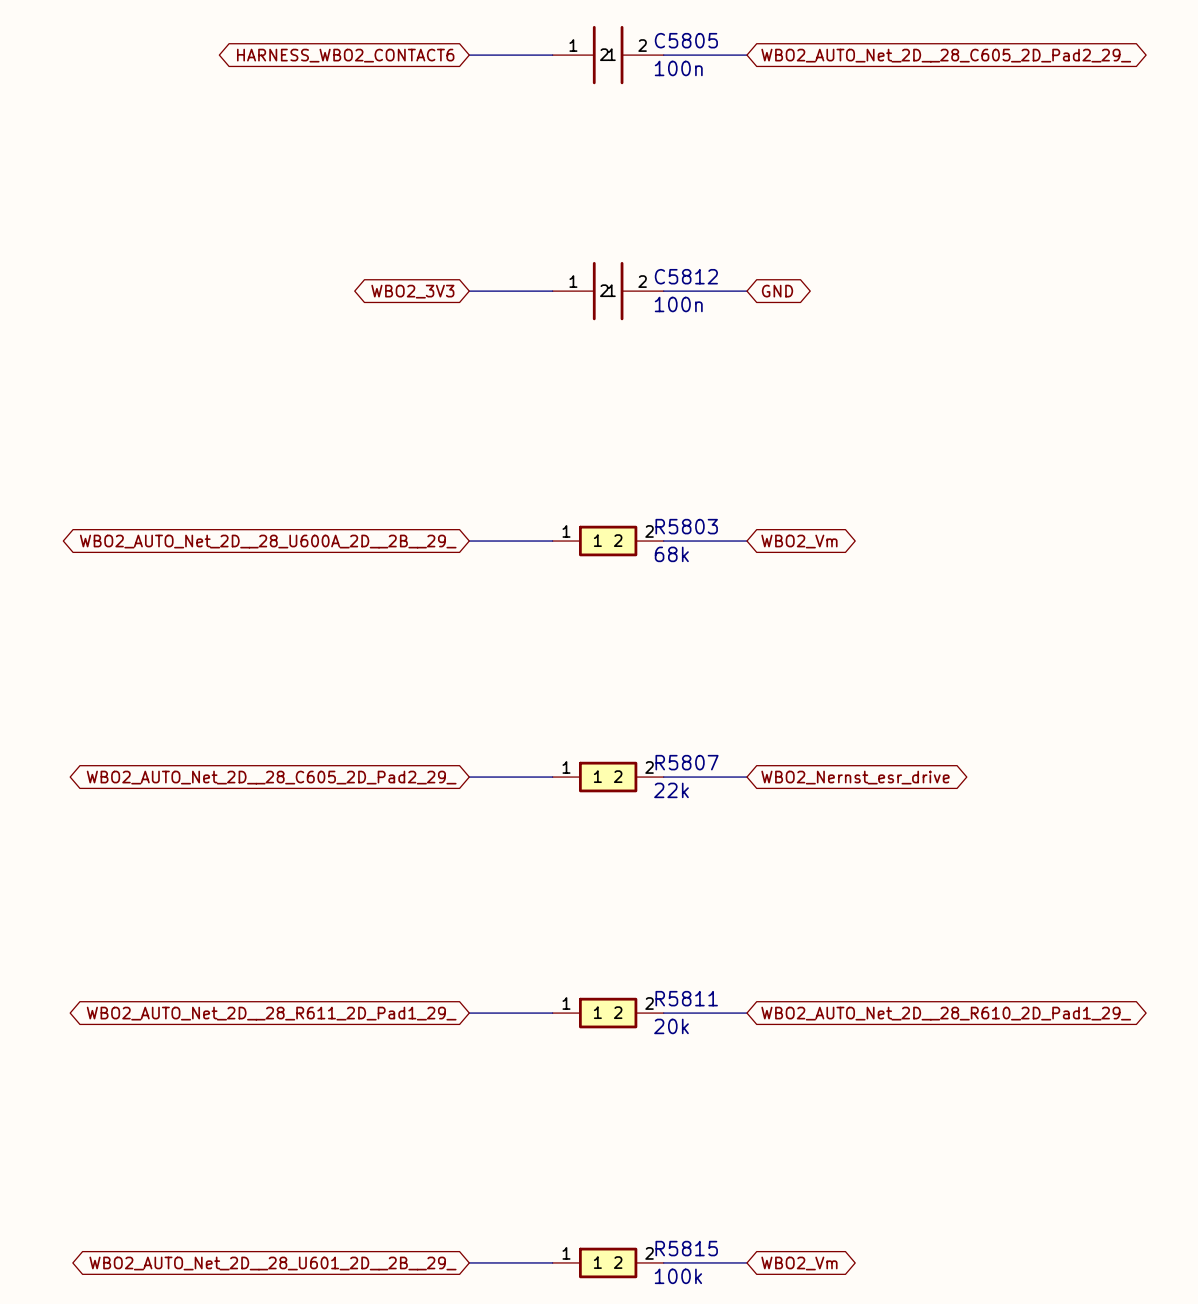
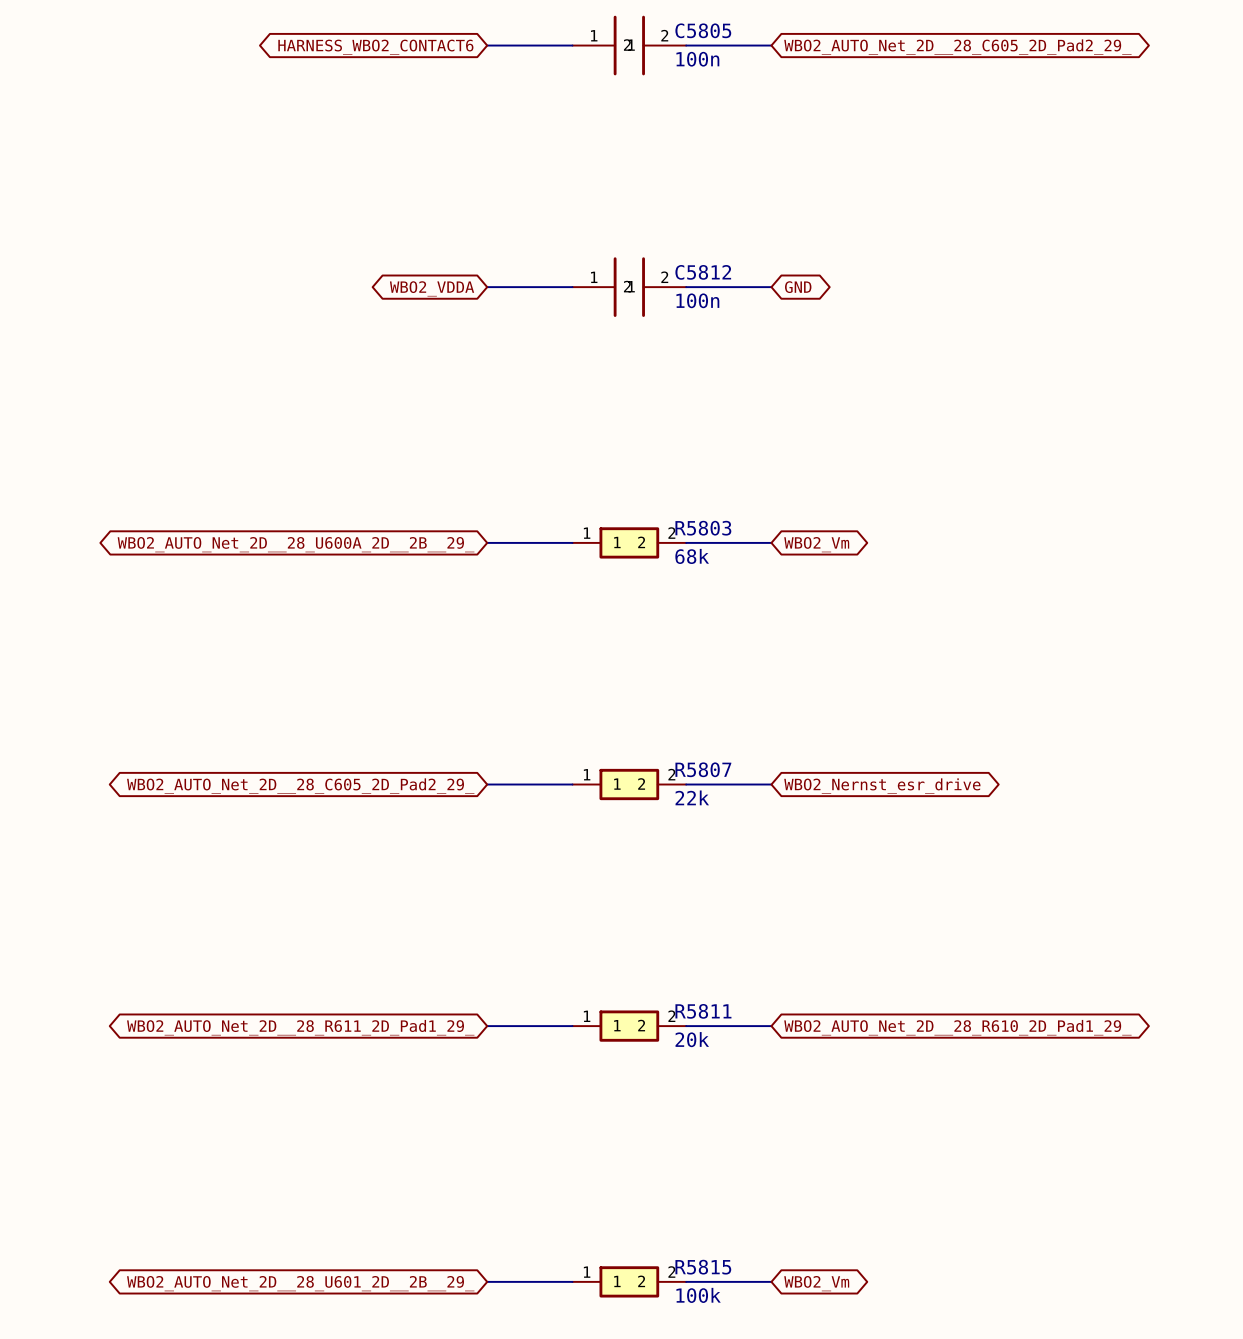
global label: WBO2_3V3 (412, 291) -> WBO2_VDDA (432, 288)

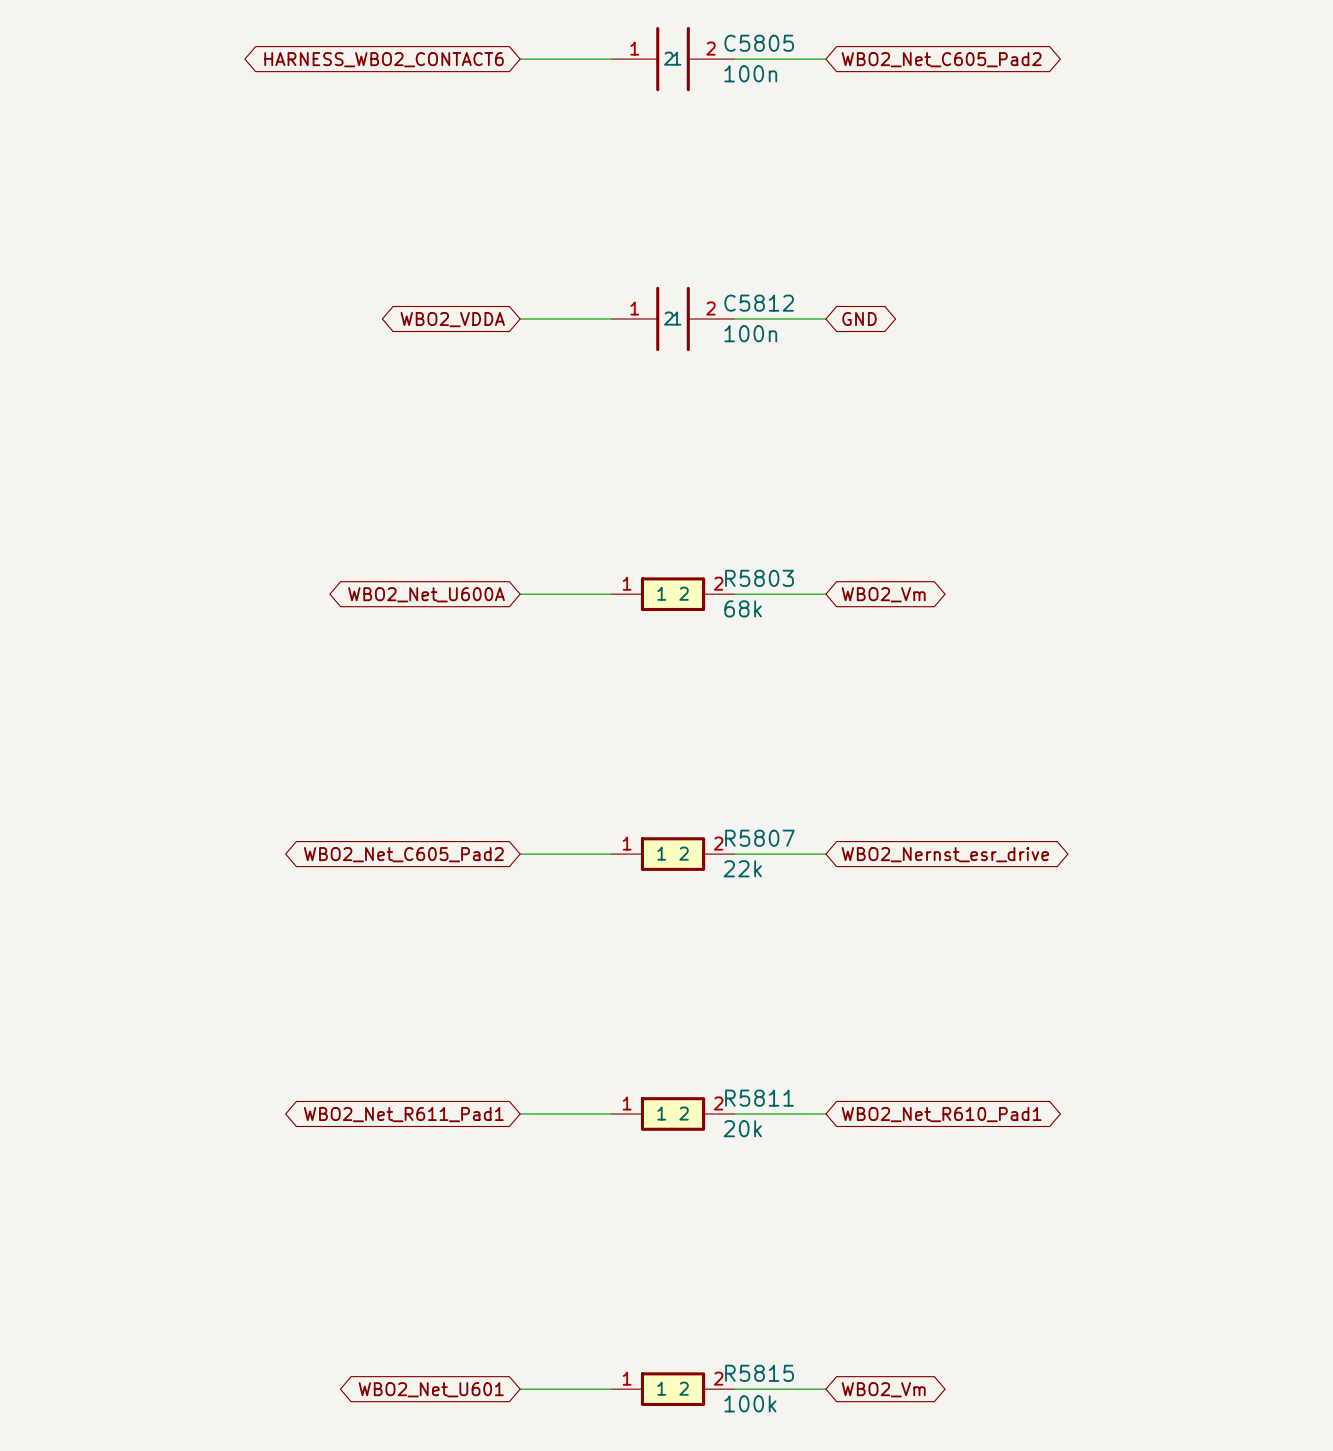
global label: WBO2_AUTO_Net_2D__28_C605_2D_Pad2_29_ (957, 47) -> WBO2_Net_C605_Pad2 (941, 59)
global label: WBO2_AUTO_Net_2D__28_U600A_2D__2B__29_ (296, 544) -> WBO2_Net_U600A (426, 594)
global label: WBO2_AUTO_Net_2D__28_C605_2D_Pad2_29_ (300, 786) -> WBO2_Net_C605_Pad2 (403, 854)
global label: WBO2_AUTO_Net_2D__28_R611_2D_Pad1_29_ (300, 1027) -> WBO2_Net_R611_Pad1 (403, 1114)
global label: WBO2_AUTO_Net_2D__28_R610_2D_Pad1_29_ (957, 1027) -> WBO2_Net_R610_Pad1 (941, 1114)
global label: WBO2_AUTO_Net_2D__28_U601_2D__2B__29_ (300, 1283) -> WBO2_Net_U601 (431, 1389)

